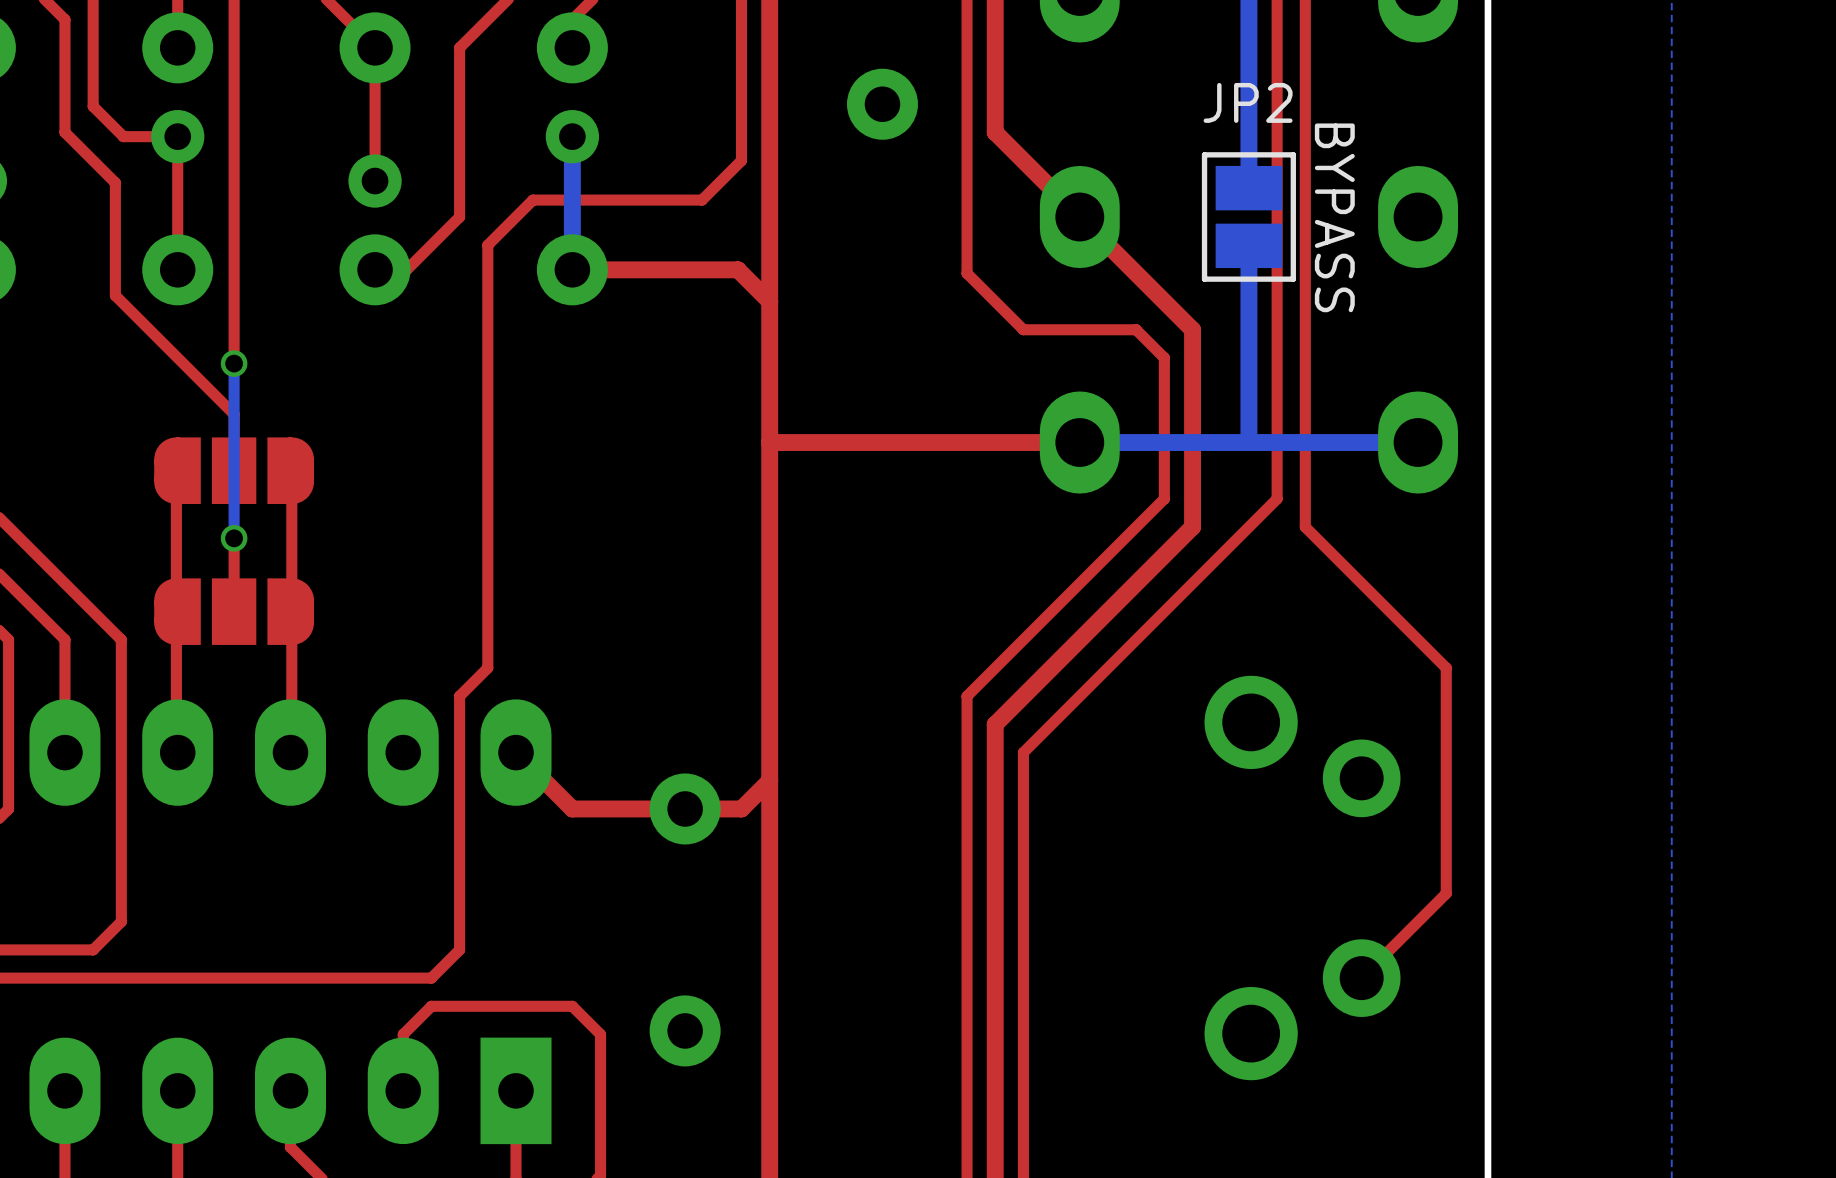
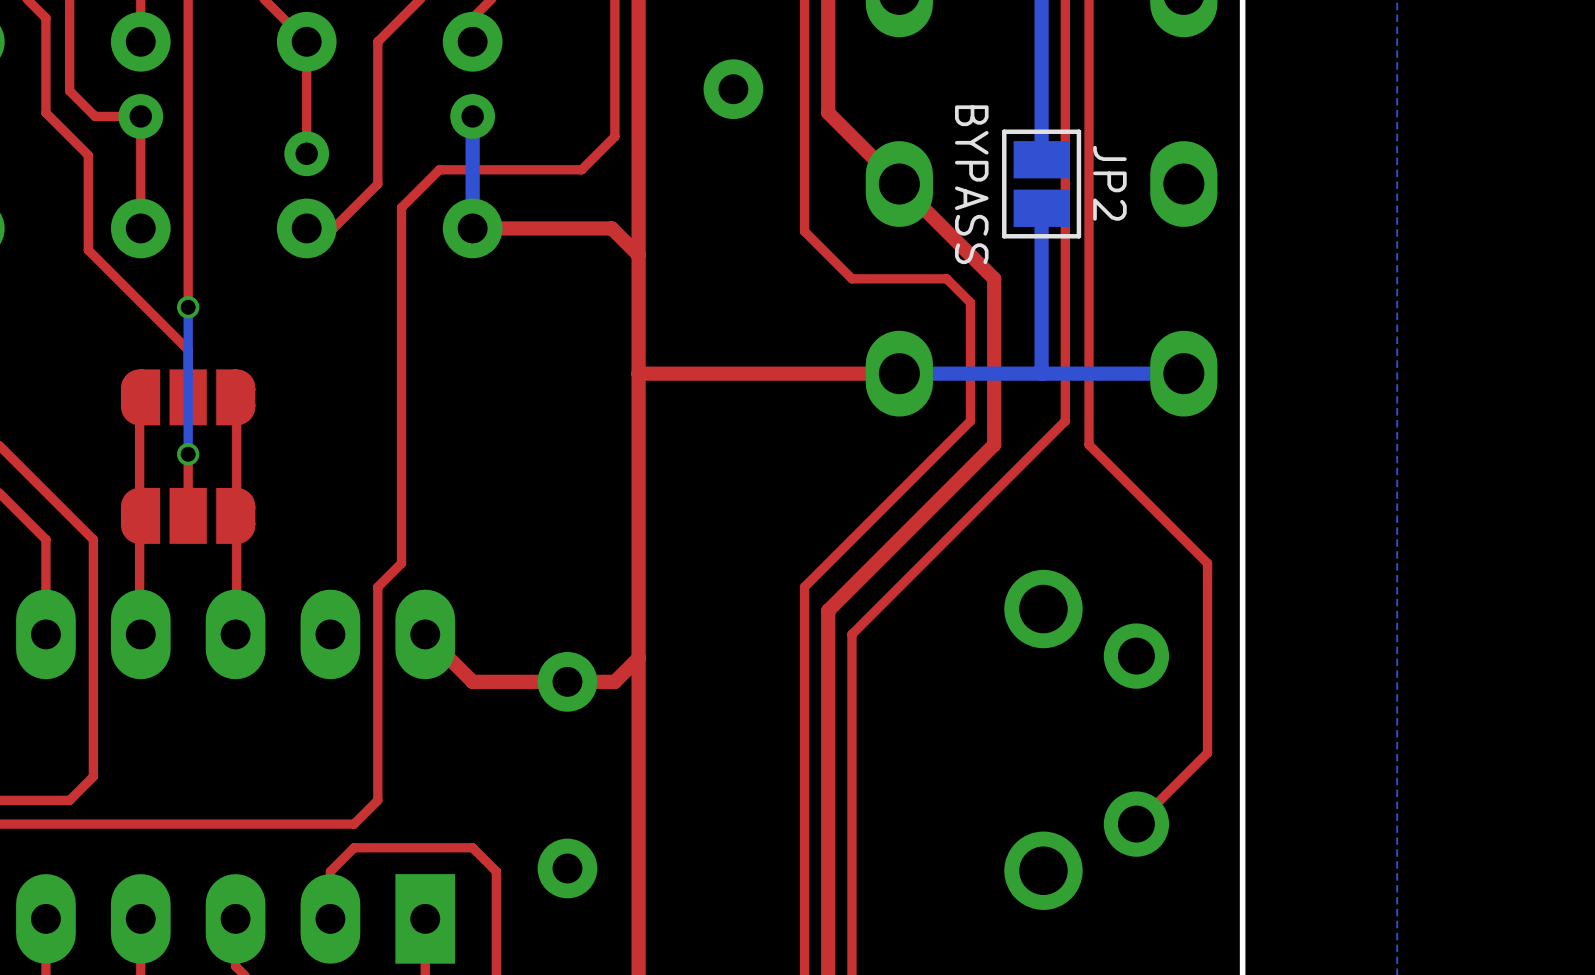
JP2 name rotation: 0° (1248, 102) -> 90° clockwise (1109, 183)
JP2 name position: JP2 (1248, 102) -> JP2 (1109, 183)
JP2 value position: BYPASS (1334, 217) -> BYPASS (971, 184)

